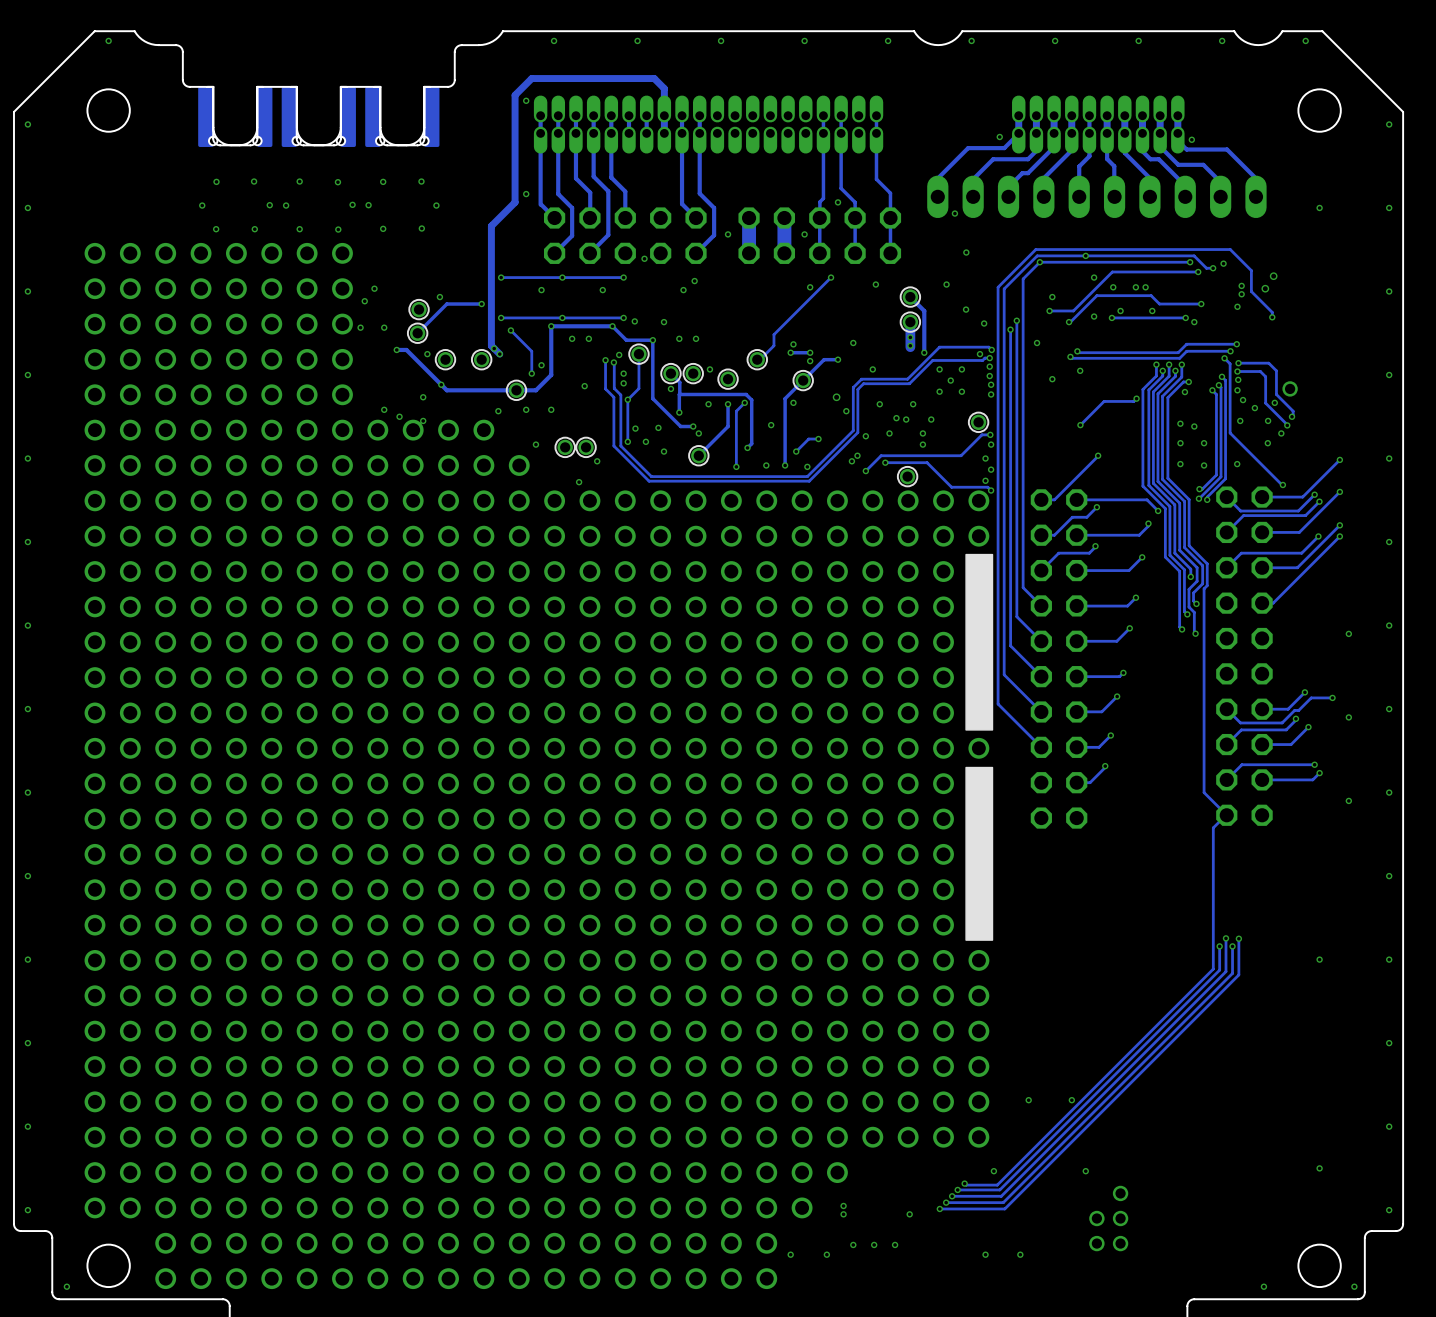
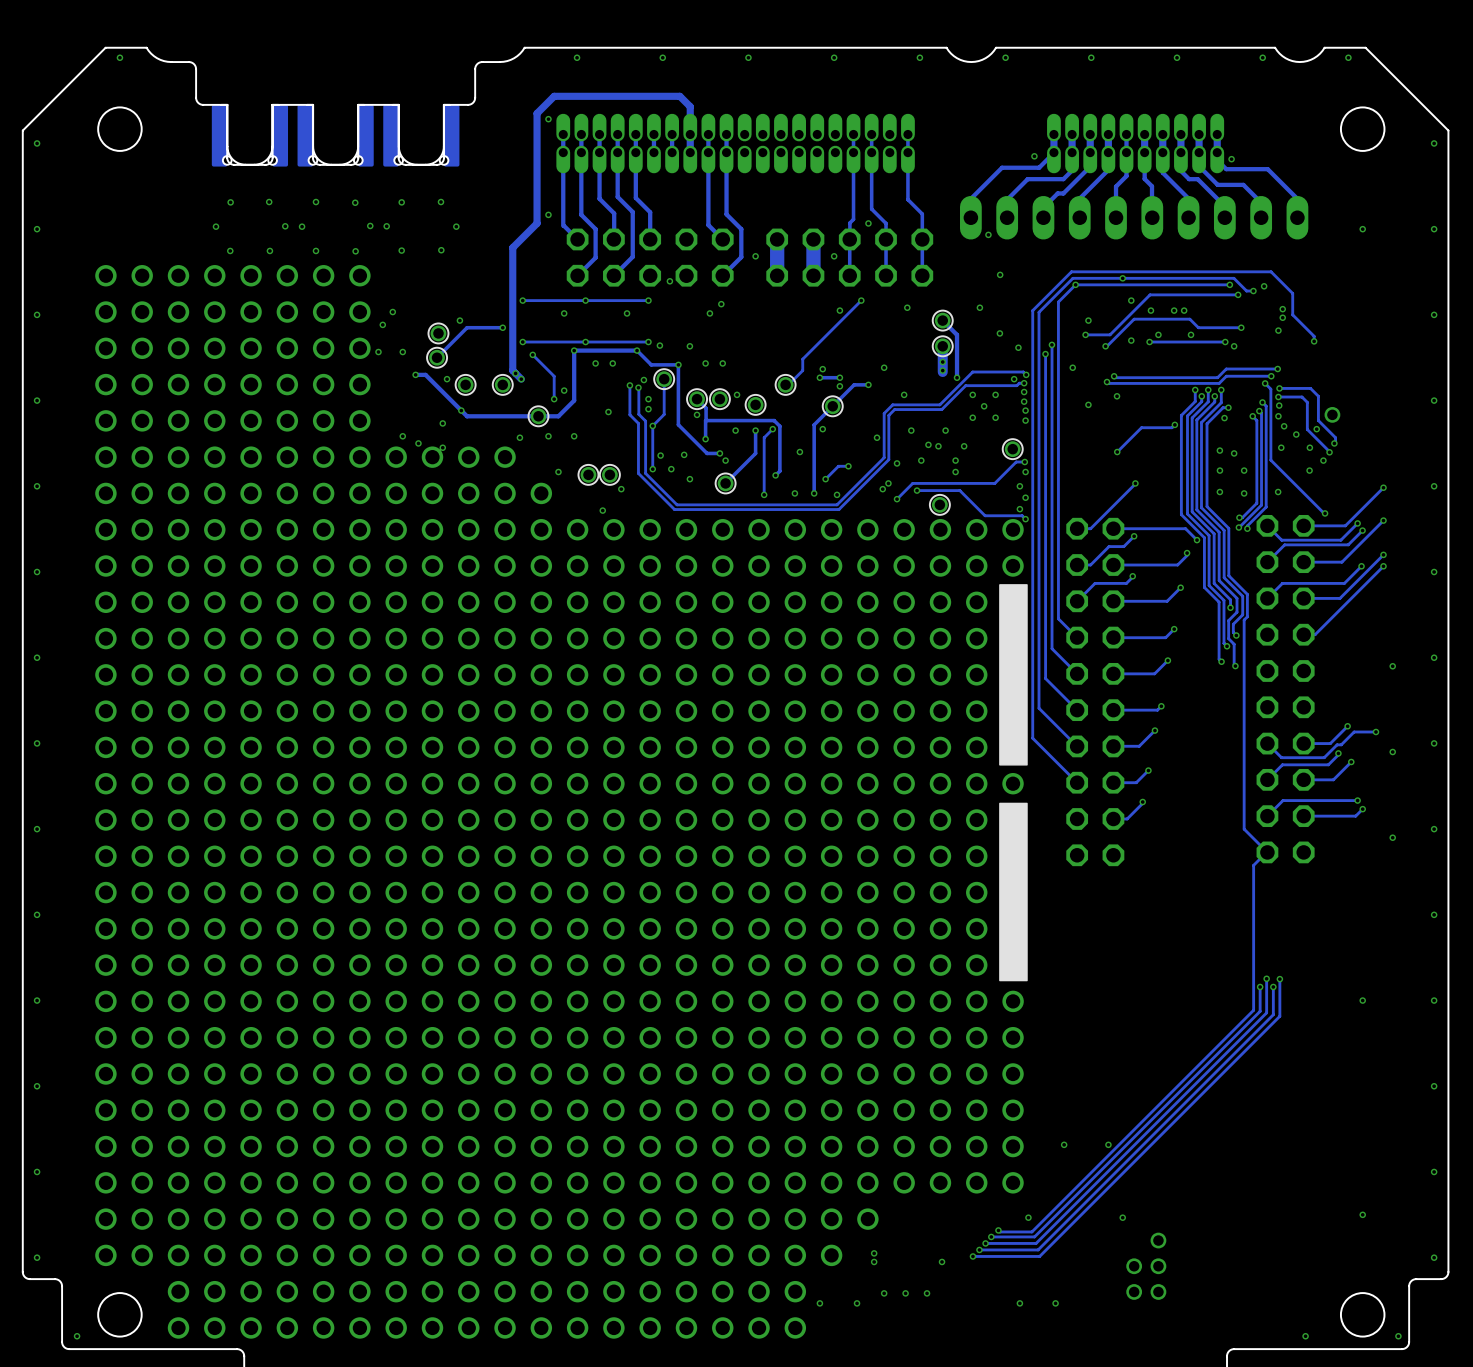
via: (1273, 276) -> none
via: (1265, 288) -> none
via: (836, 397) -> none

